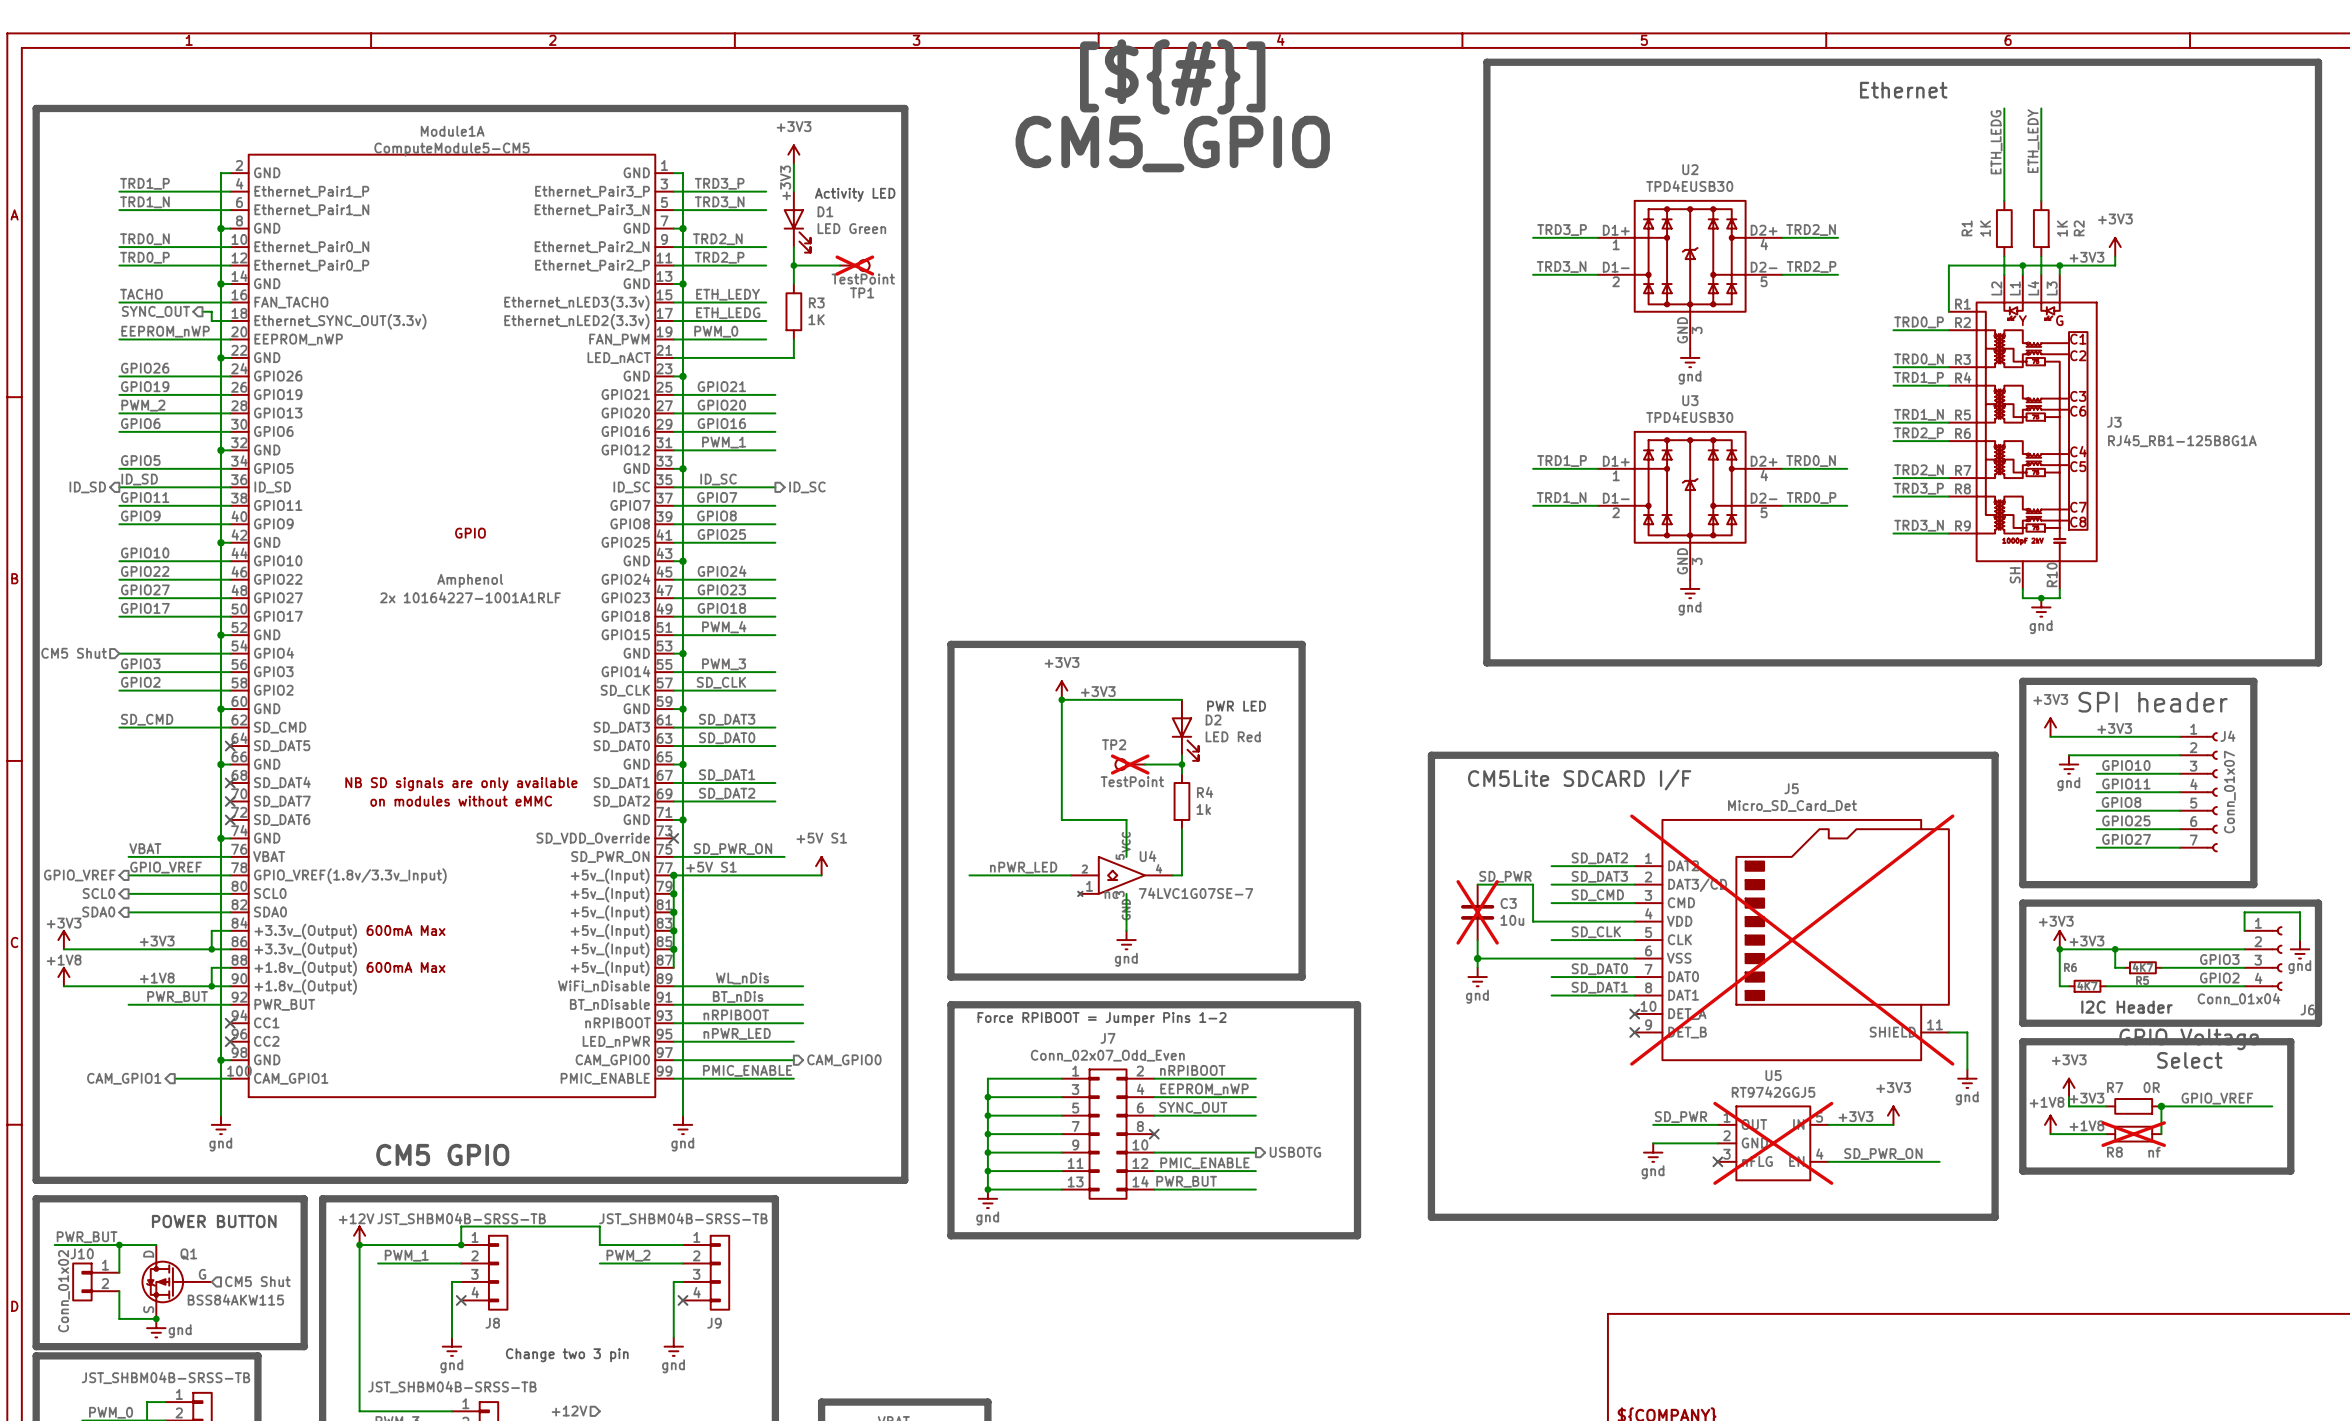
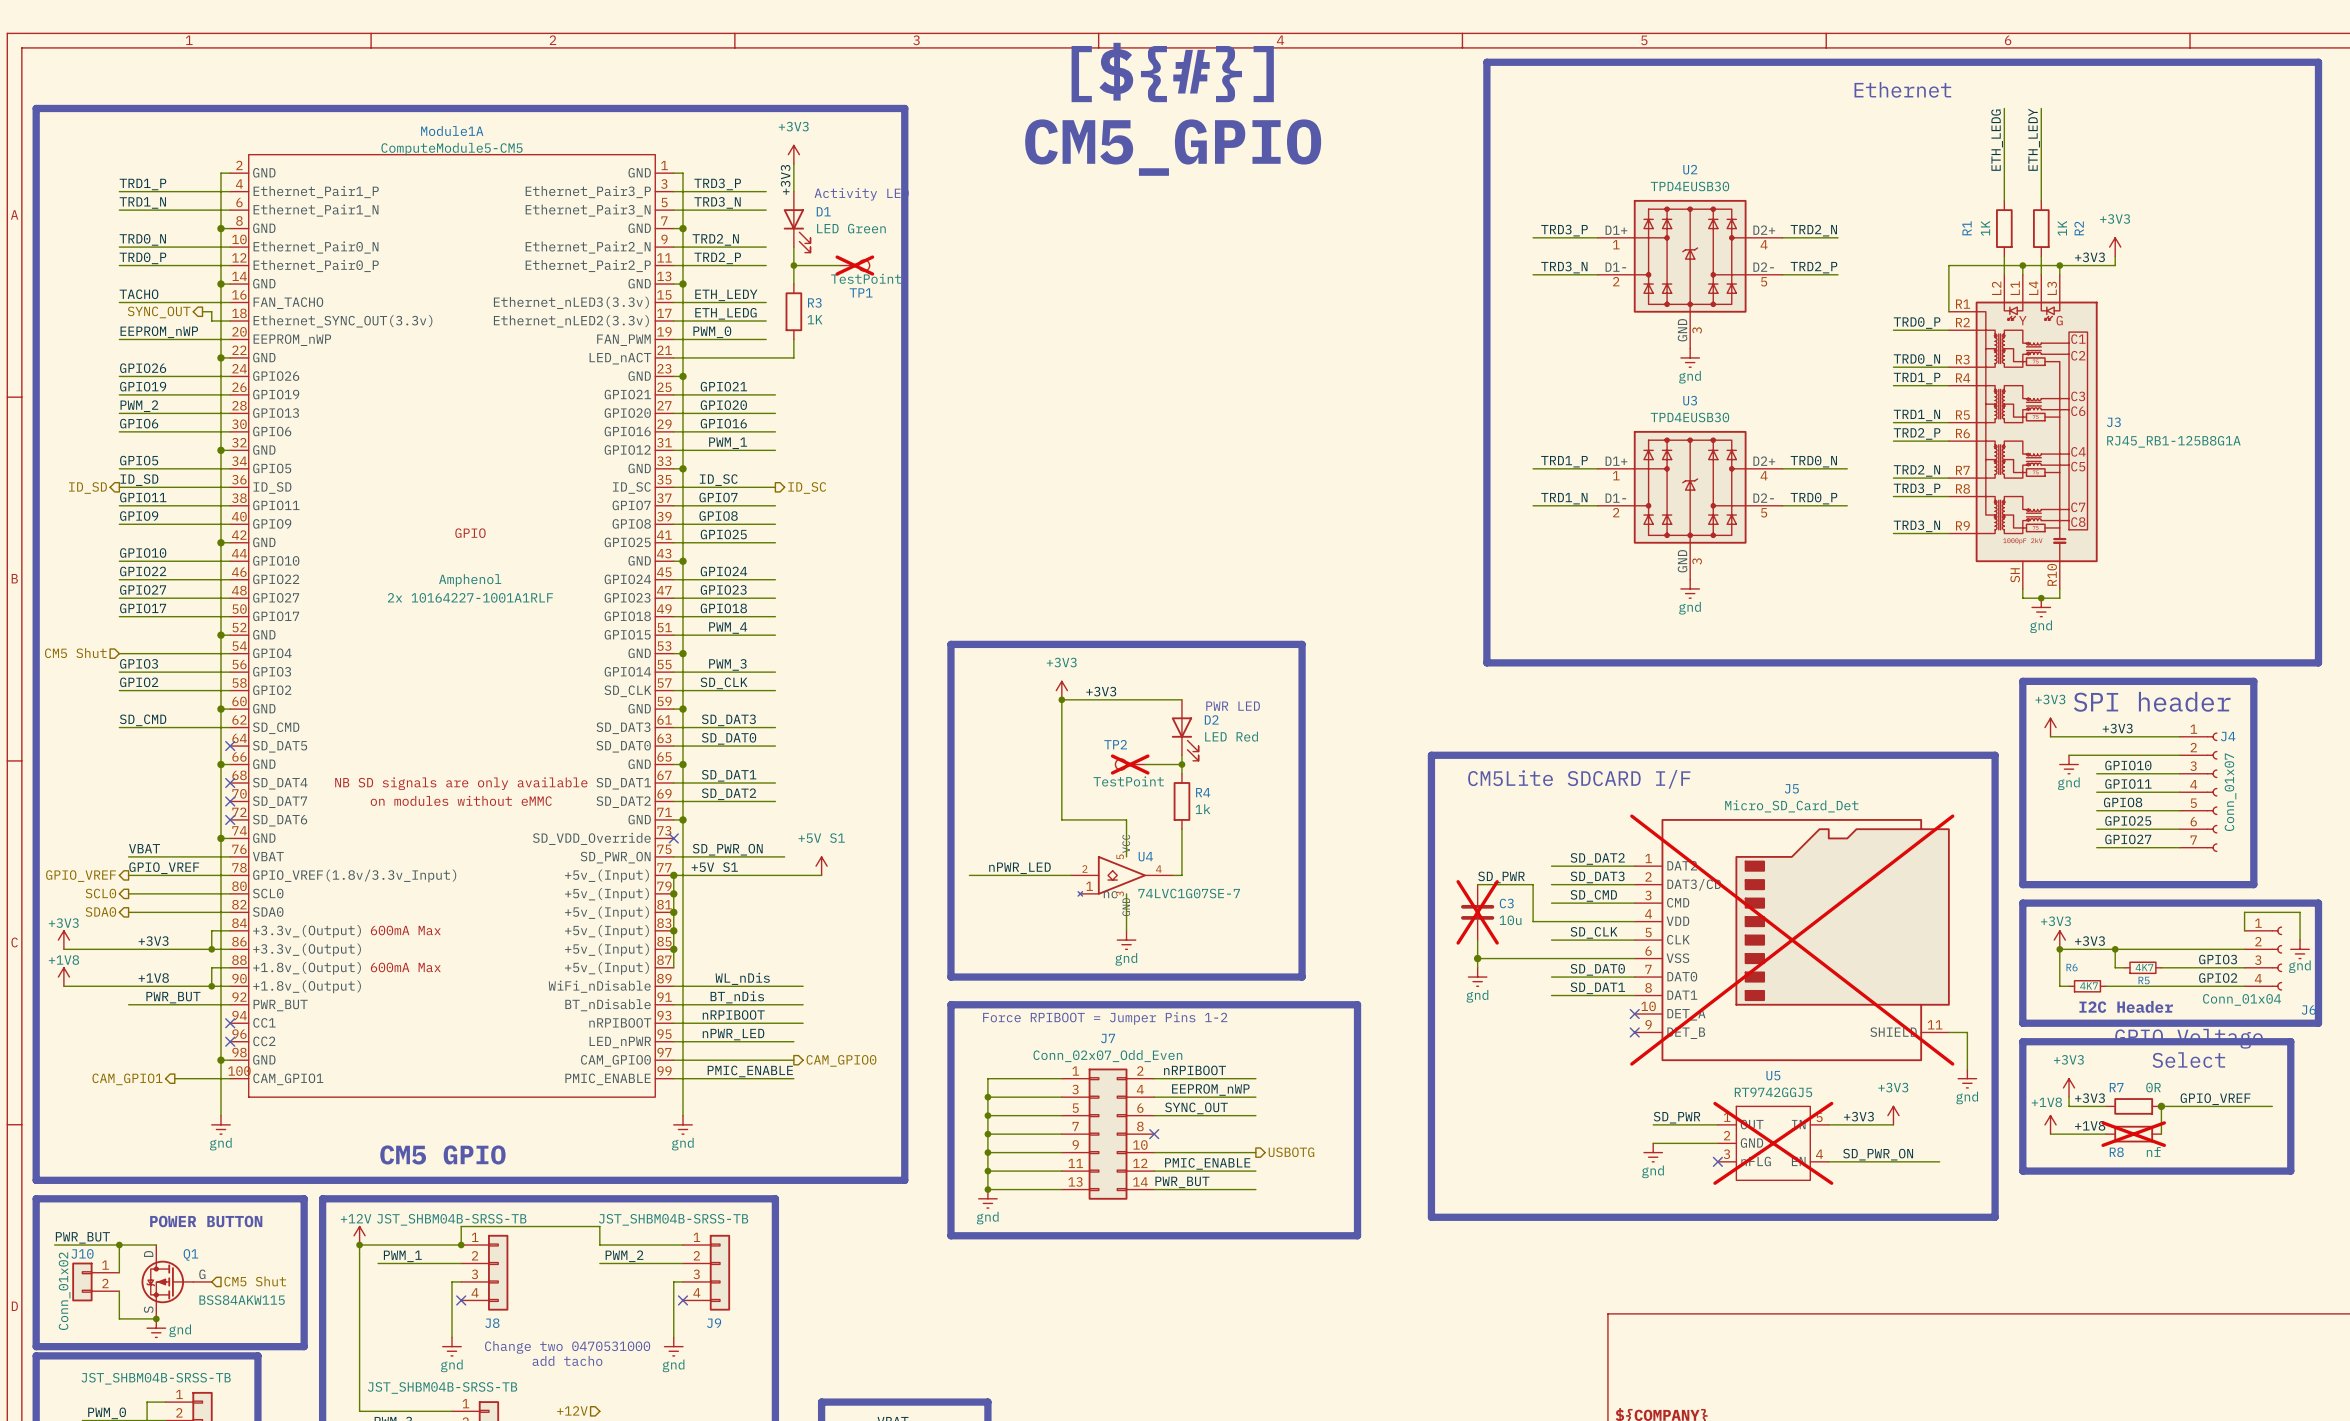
text: Change two 3 pin (567, 1355) -> Change two 0470531000 (567, 1347)
text: none -> add tacho (567, 1360)

